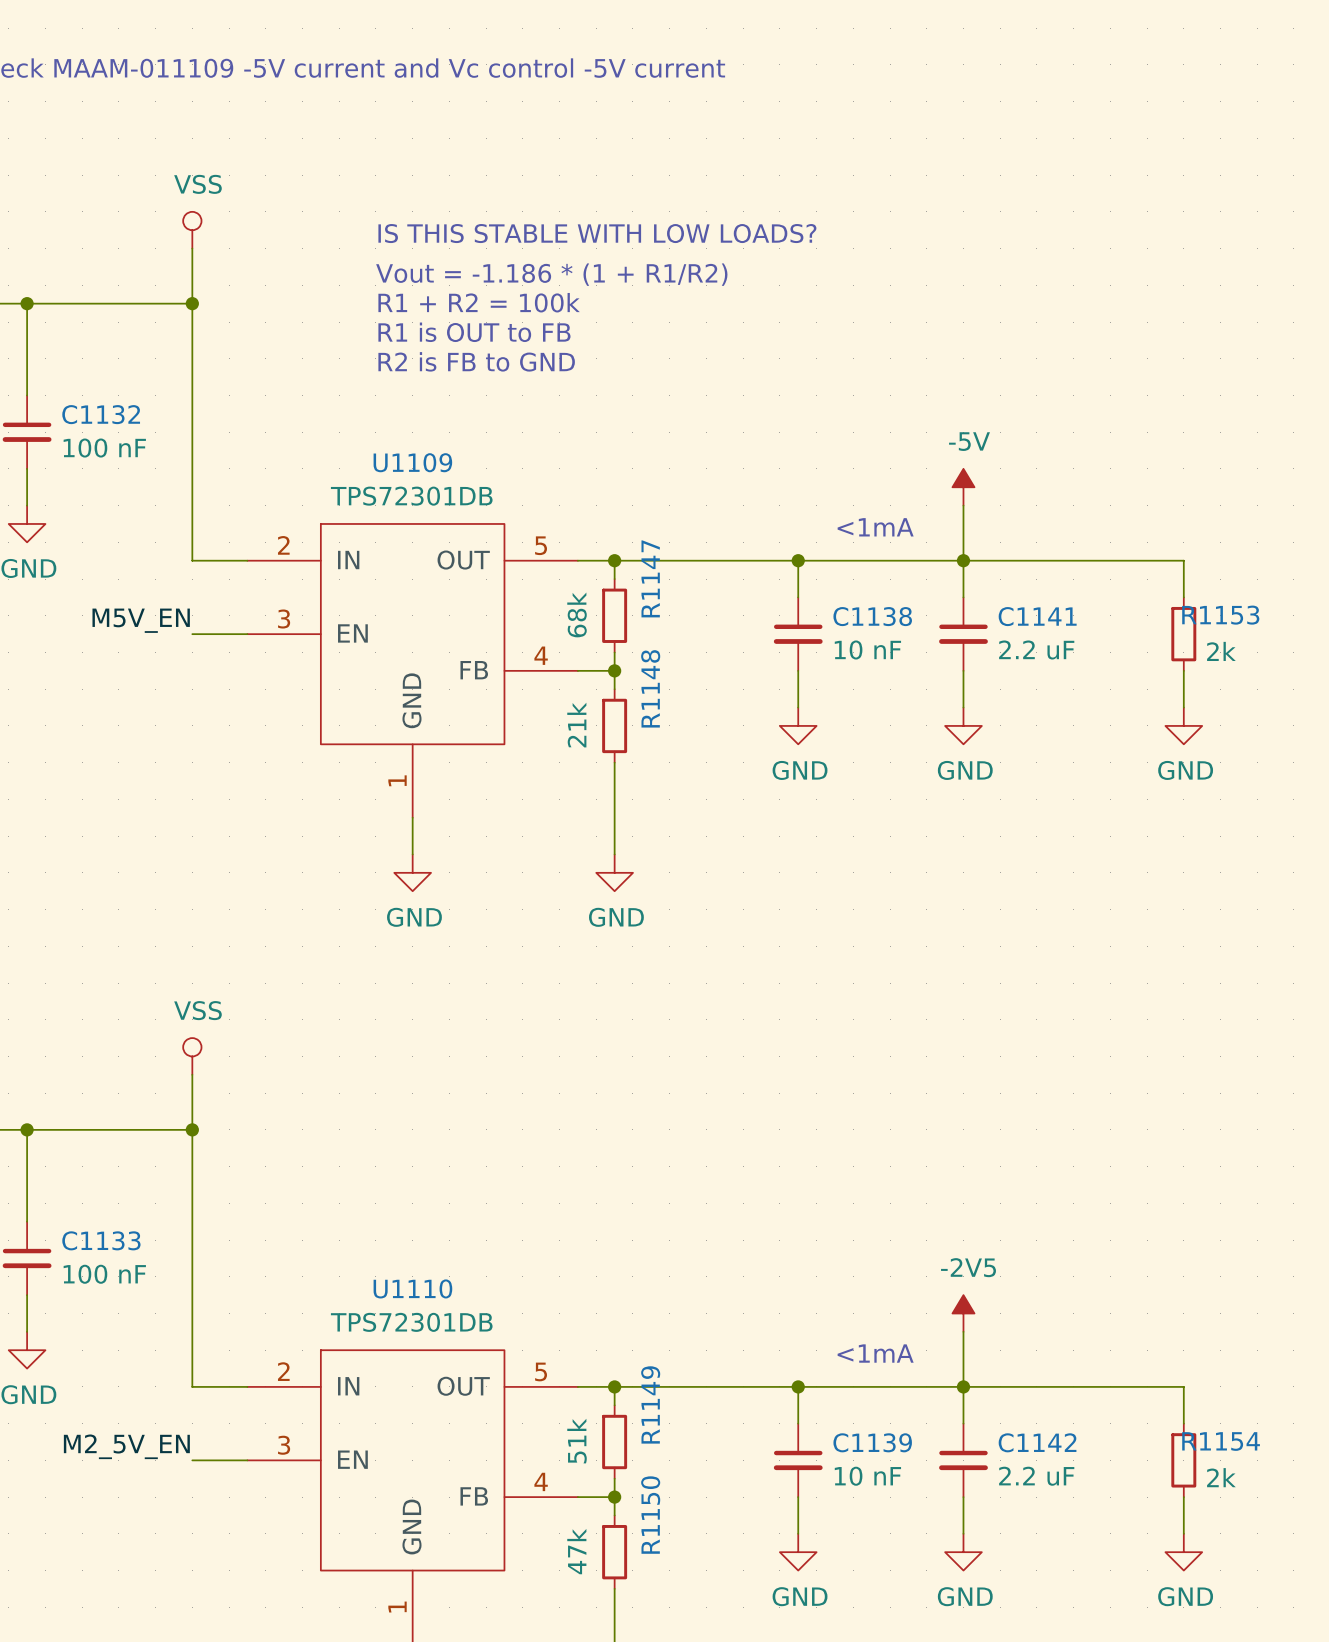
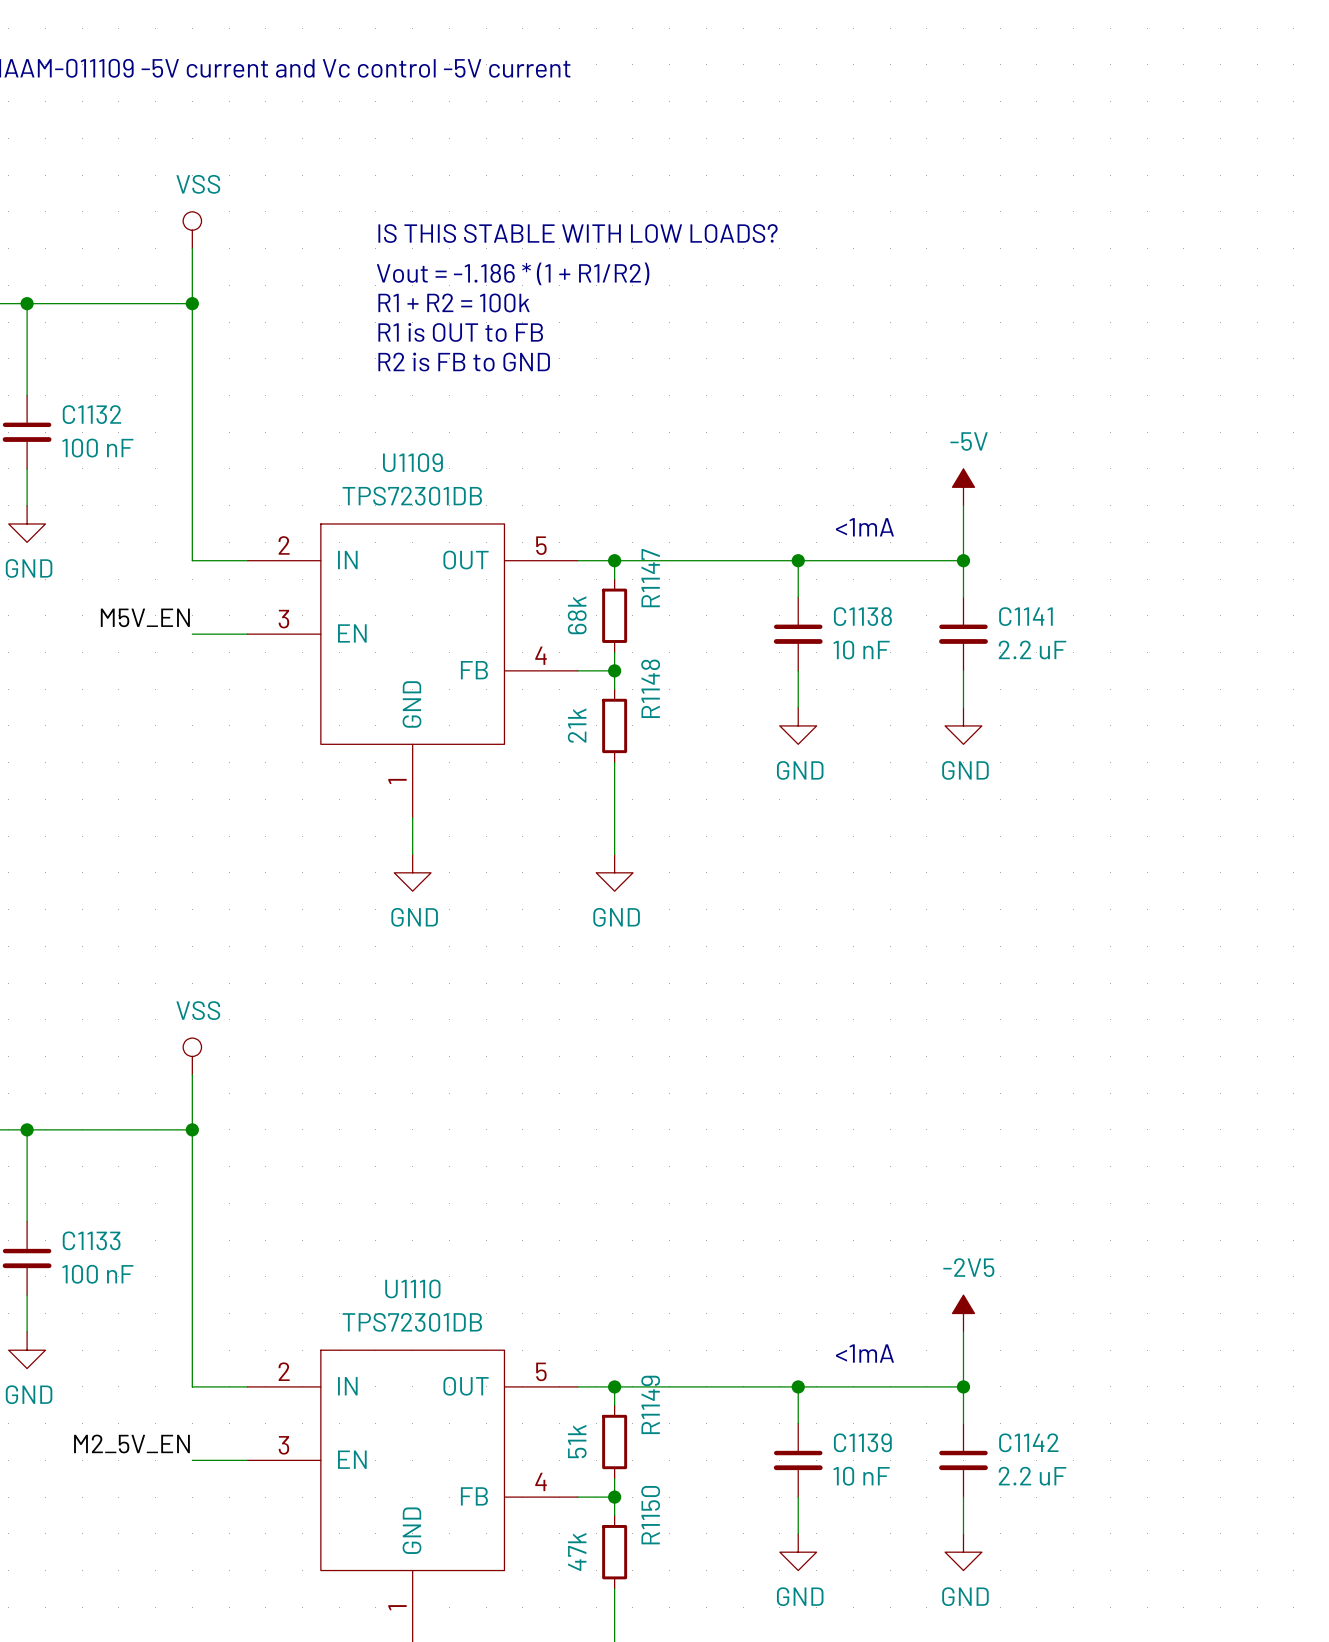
wire: (963, 560) (1183, 560) (1183, 597) -> none
R1153: 2k (1183, 634) -> none
wire: (1183, 670) (1183, 707) -> none
power symbol: GND (1183, 725) -> none
wire: (963, 1386) (1183, 1386) (1183, 1423) -> none
R1154: 2k (1183, 1460) -> none
wire: (1183, 1497) (1183, 1533) -> none
power symbol: GND (1183, 1552) -> none

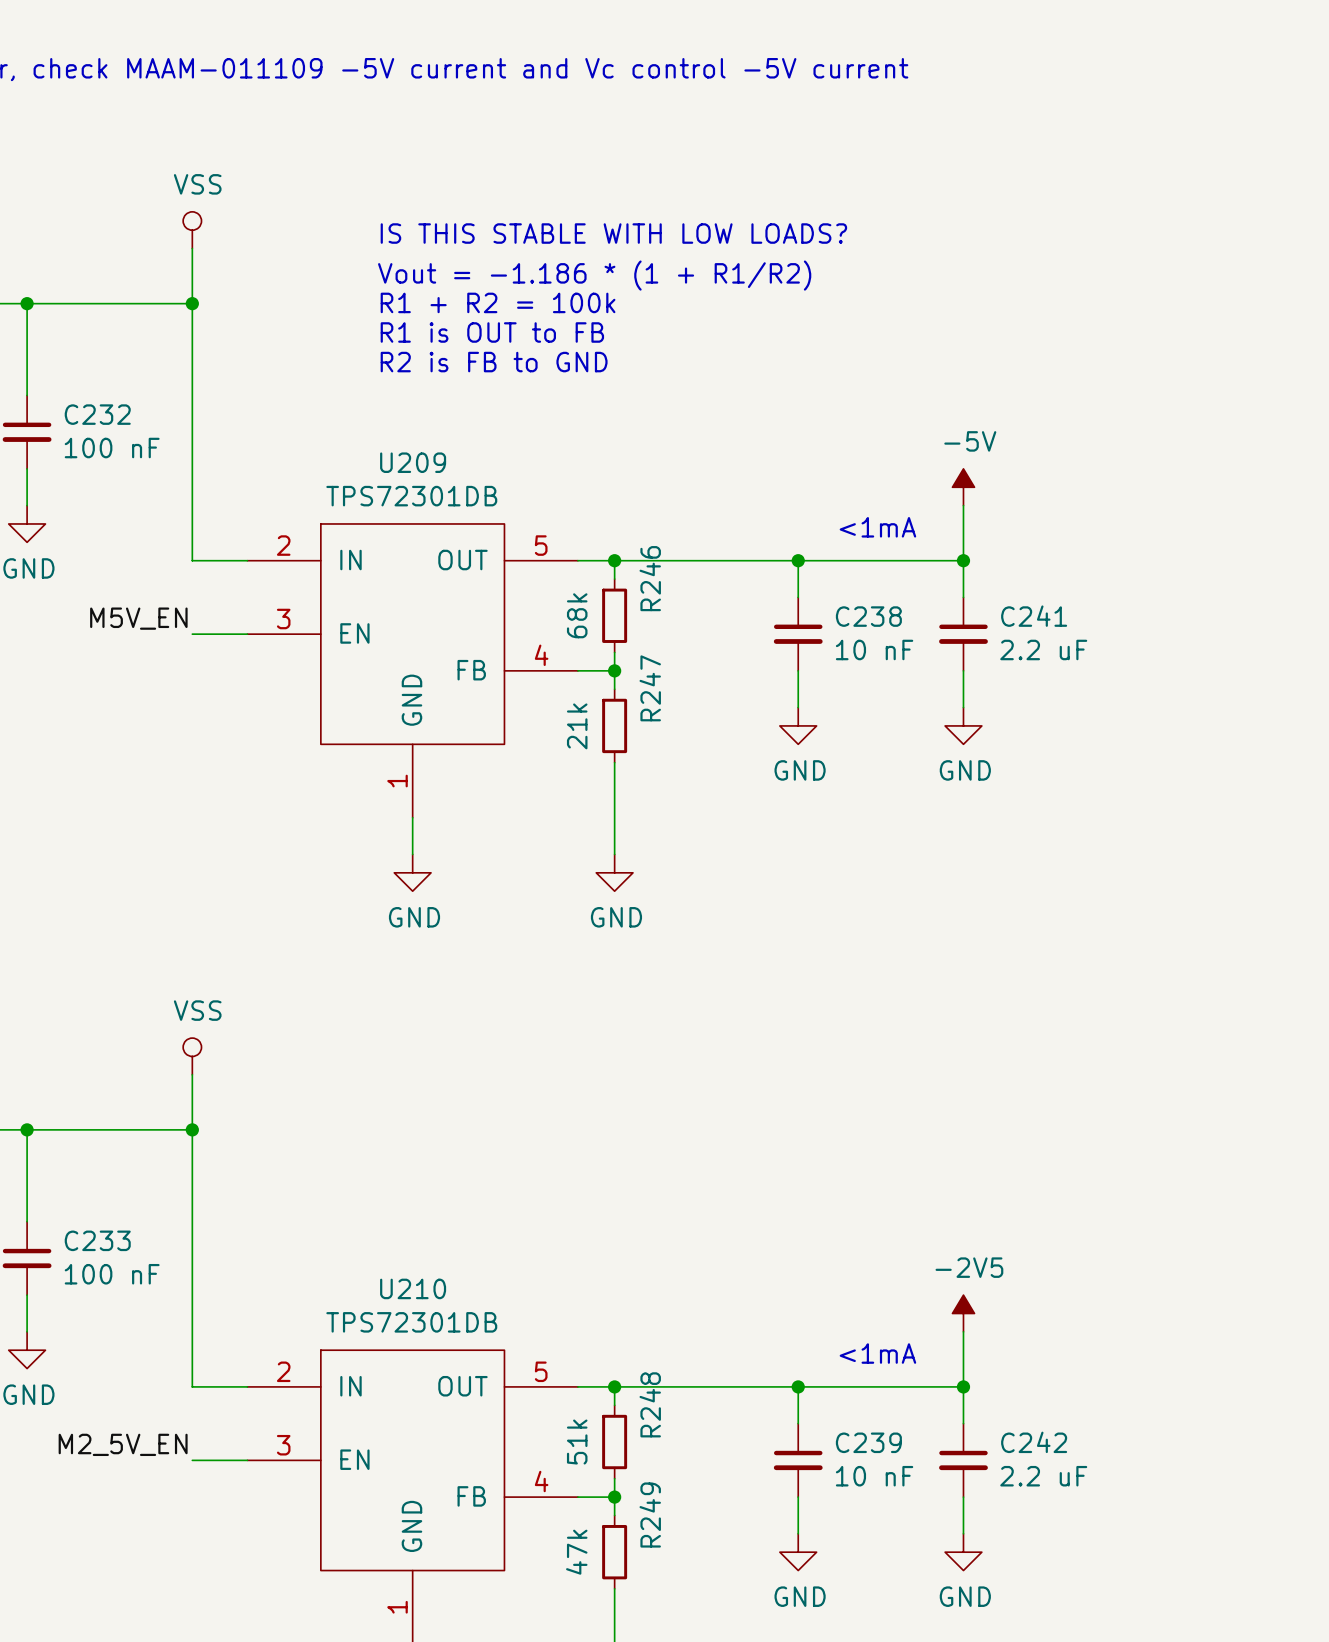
C1132 name: C1132 (91, 414) -> C232 (97, 414)
U1109 name: U1109 (412, 462) -> U209 (413, 462)
R1147 name: R1147 (650, 578) -> R246 (650, 578)
C1138 name: C1138 (862, 616) -> C238 (868, 616)
C1141 name: C1141 (1025, 616) -> C241 (1034, 616)
R1148 name: R1148 (650, 688) -> R247 (650, 688)
C1133 name: C1133 (91, 1240) -> C233 (97, 1240)
U1110 name: U1110 (412, 1288) -> U210 (413, 1288)
R1149 name: R1149 (650, 1404) -> R248 (650, 1404)
C1139 name: C1139 (862, 1442) -> C239 (868, 1442)
C1142 name: C1142 (1028, 1442) -> C242 (1034, 1442)
R1150 name: R1150 (650, 1515) -> R249 (650, 1515)

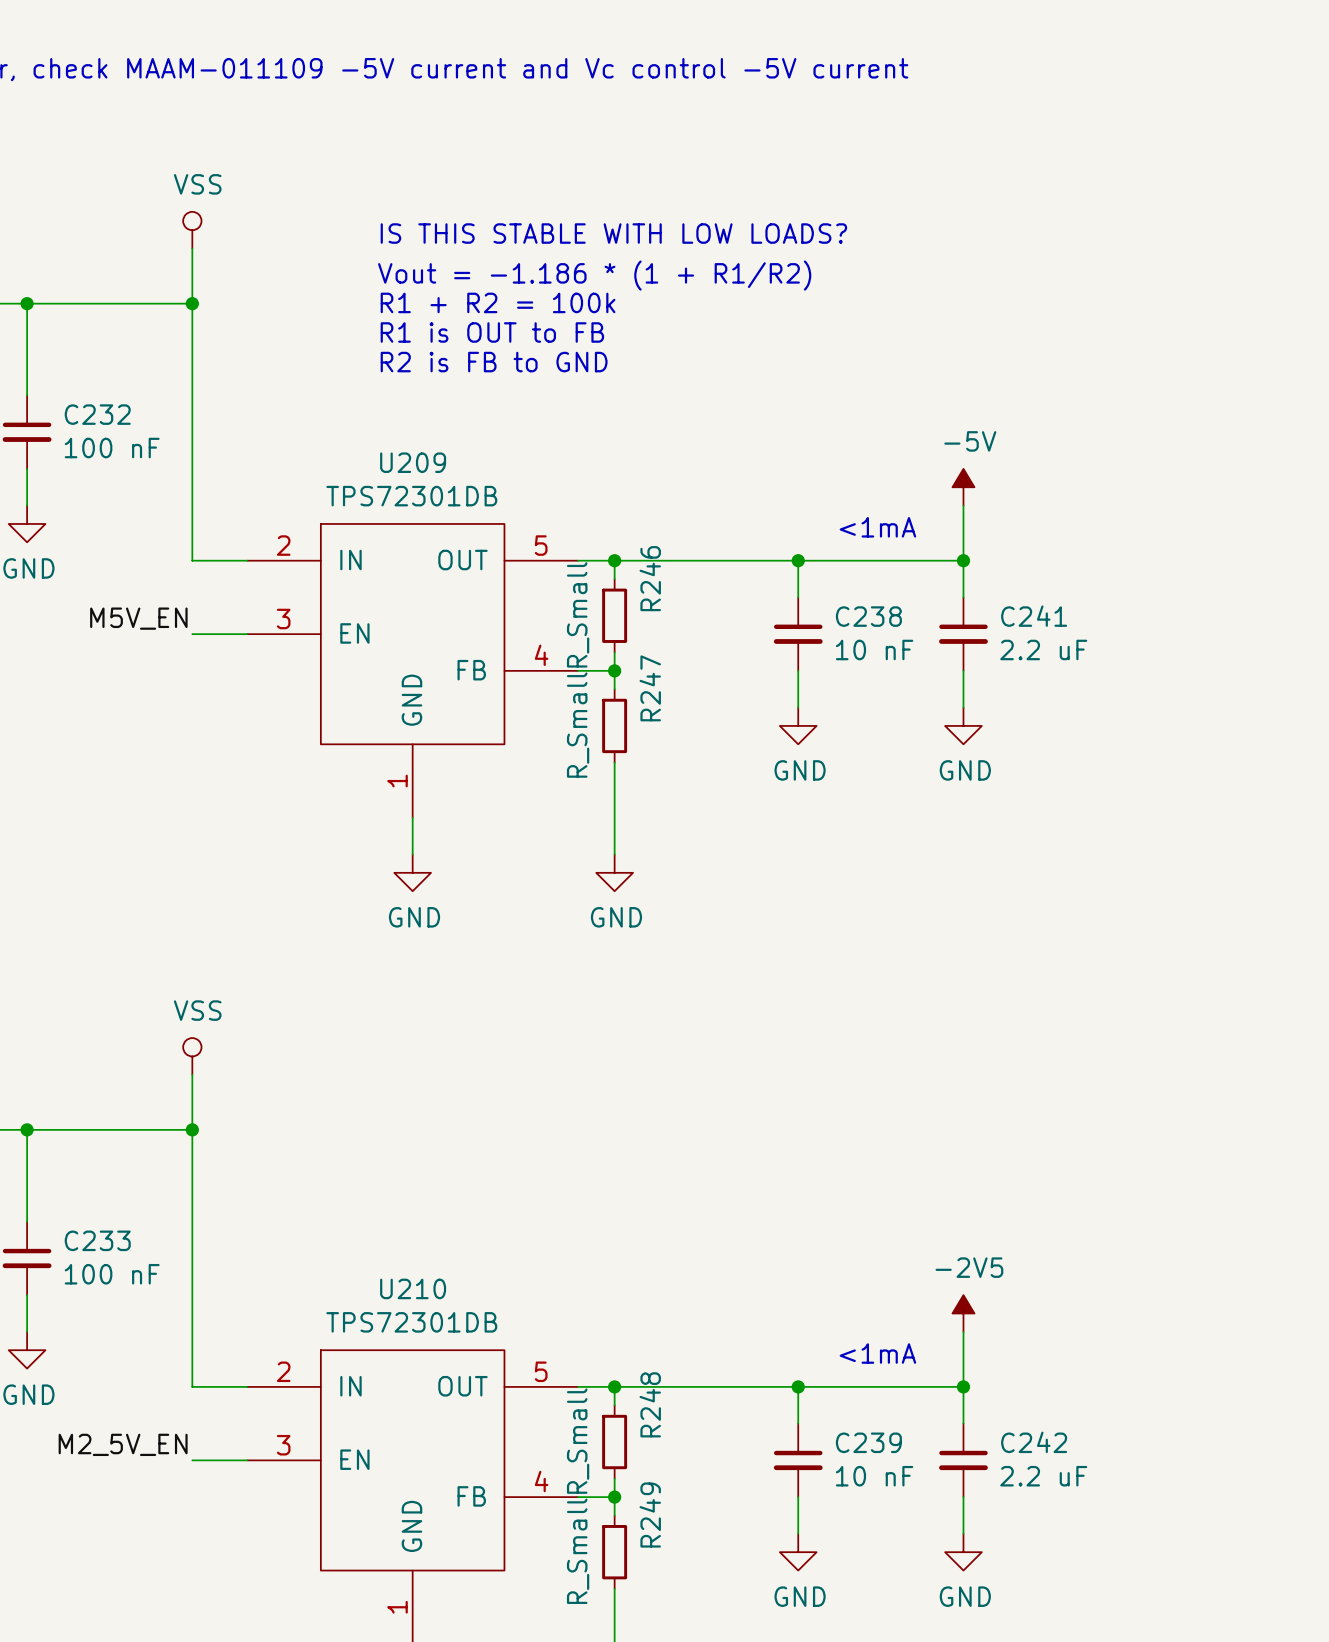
R246 value: 68k (577, 615) -> R_Small (578, 614)
R247 value: 21k (577, 726) -> R_Small (578, 725)
R248 value: 51k (577, 1442) -> R_Small (578, 1441)
R249 value: 47k (576, 1552) -> R_Small (578, 1551)

